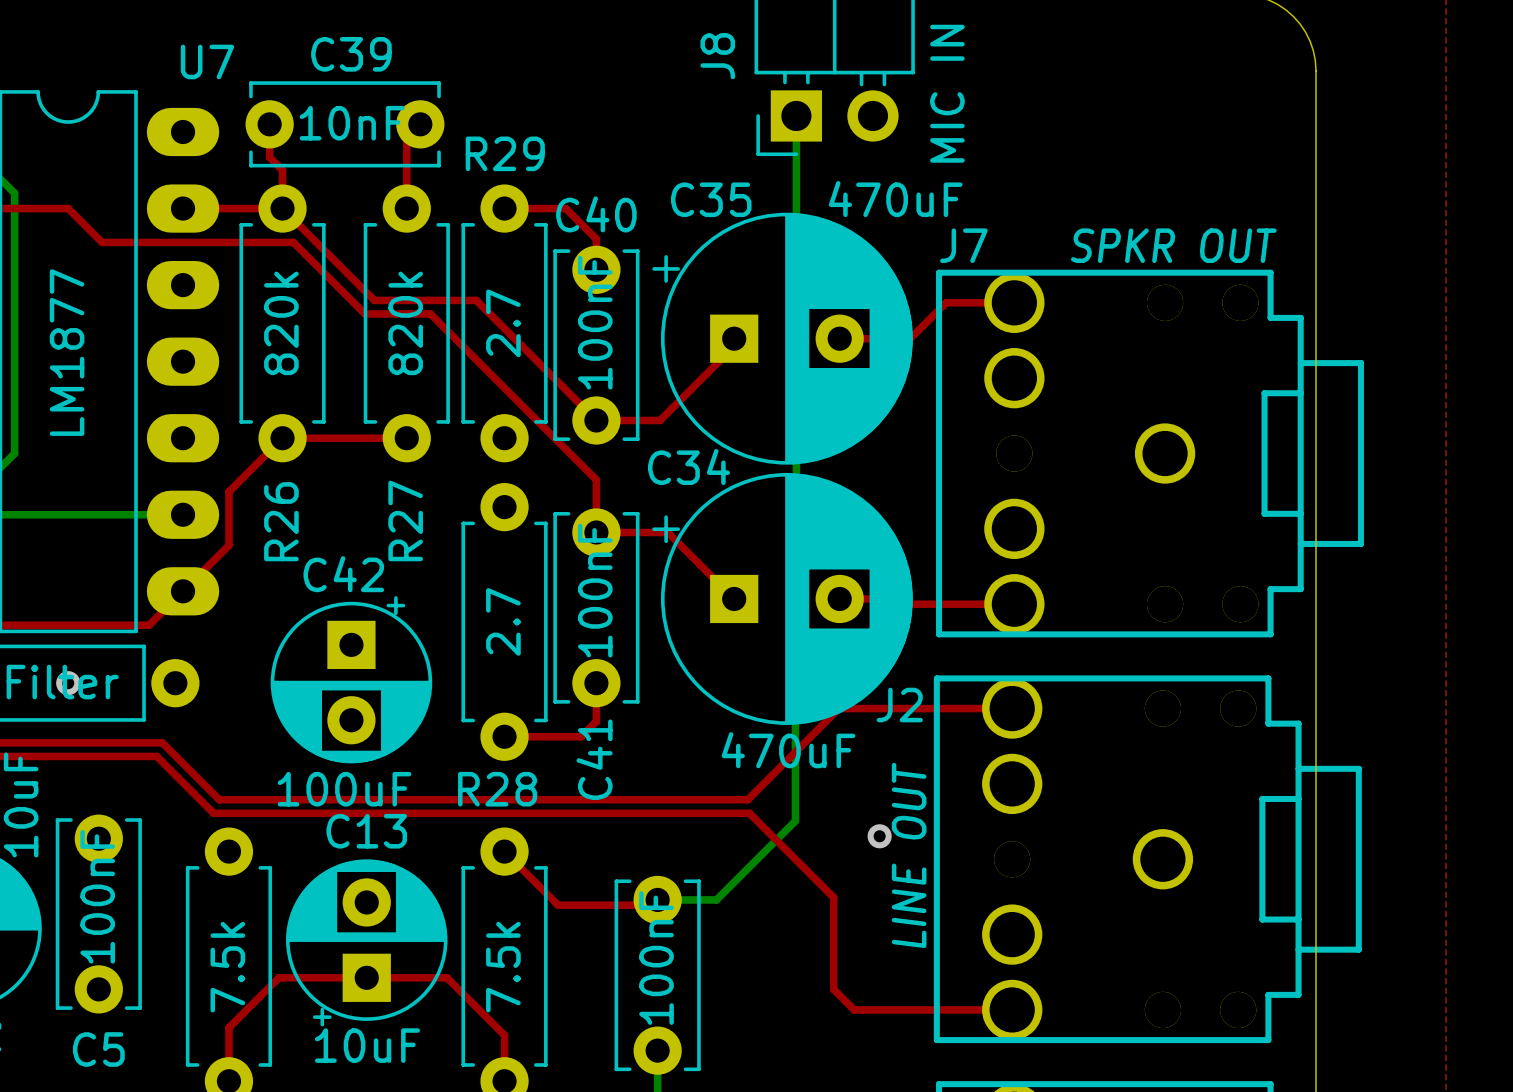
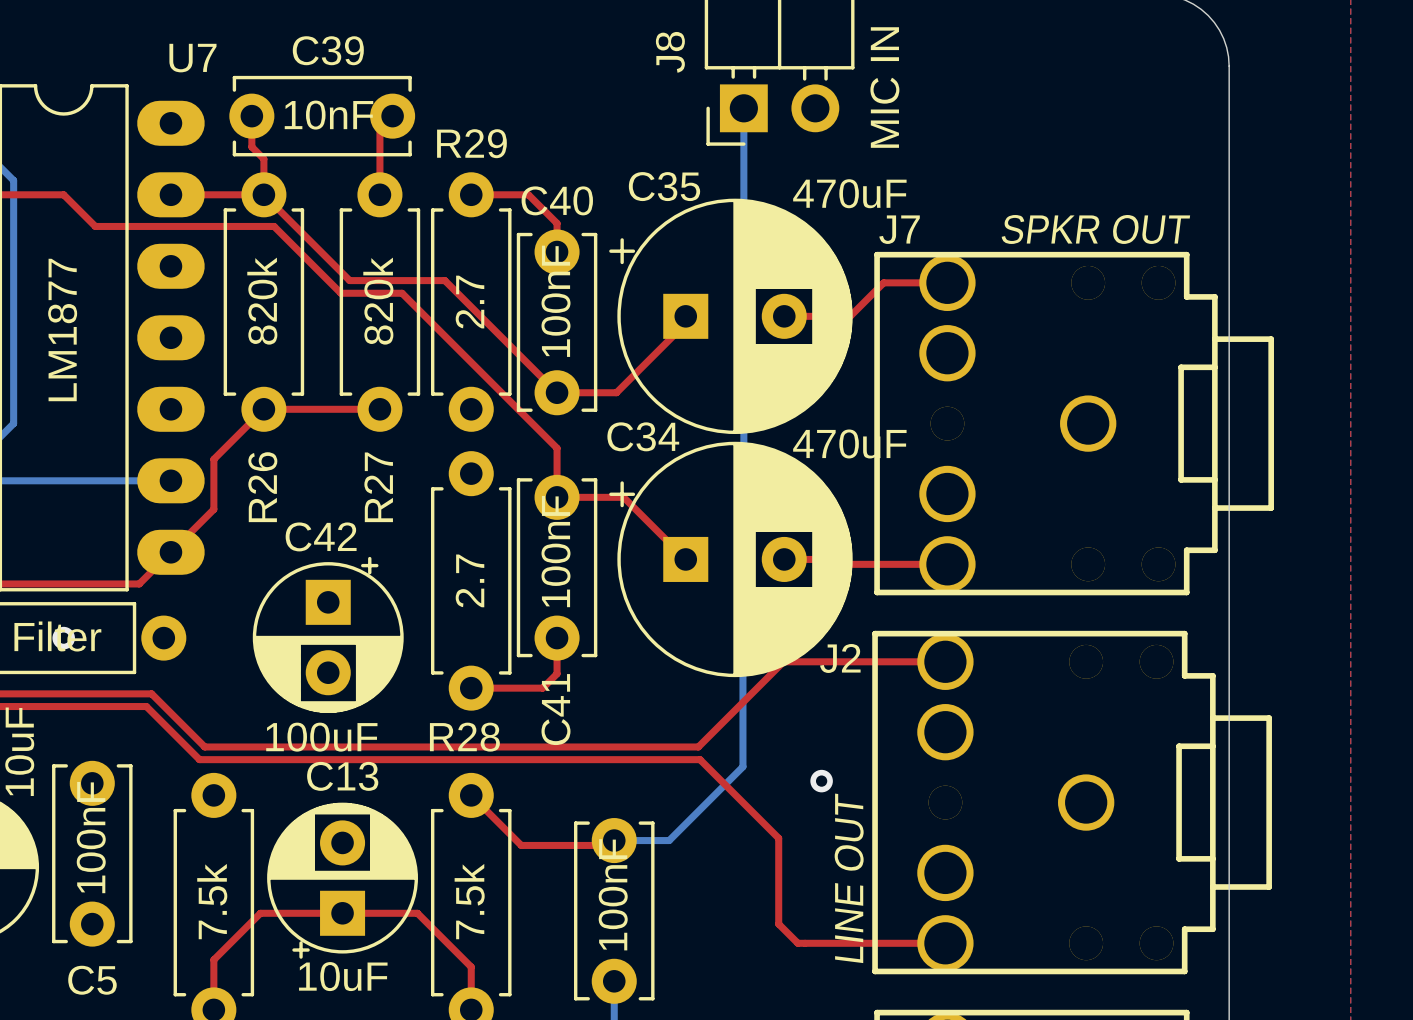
C35 value position: 470uF (895, 199) -> 470uF (849, 443)
C34 value position: 470uF (788, 750) -> 470uF (849, 193)
J2 value position: LINE OUT (909, 855) -> LINE OUT (849, 878)

